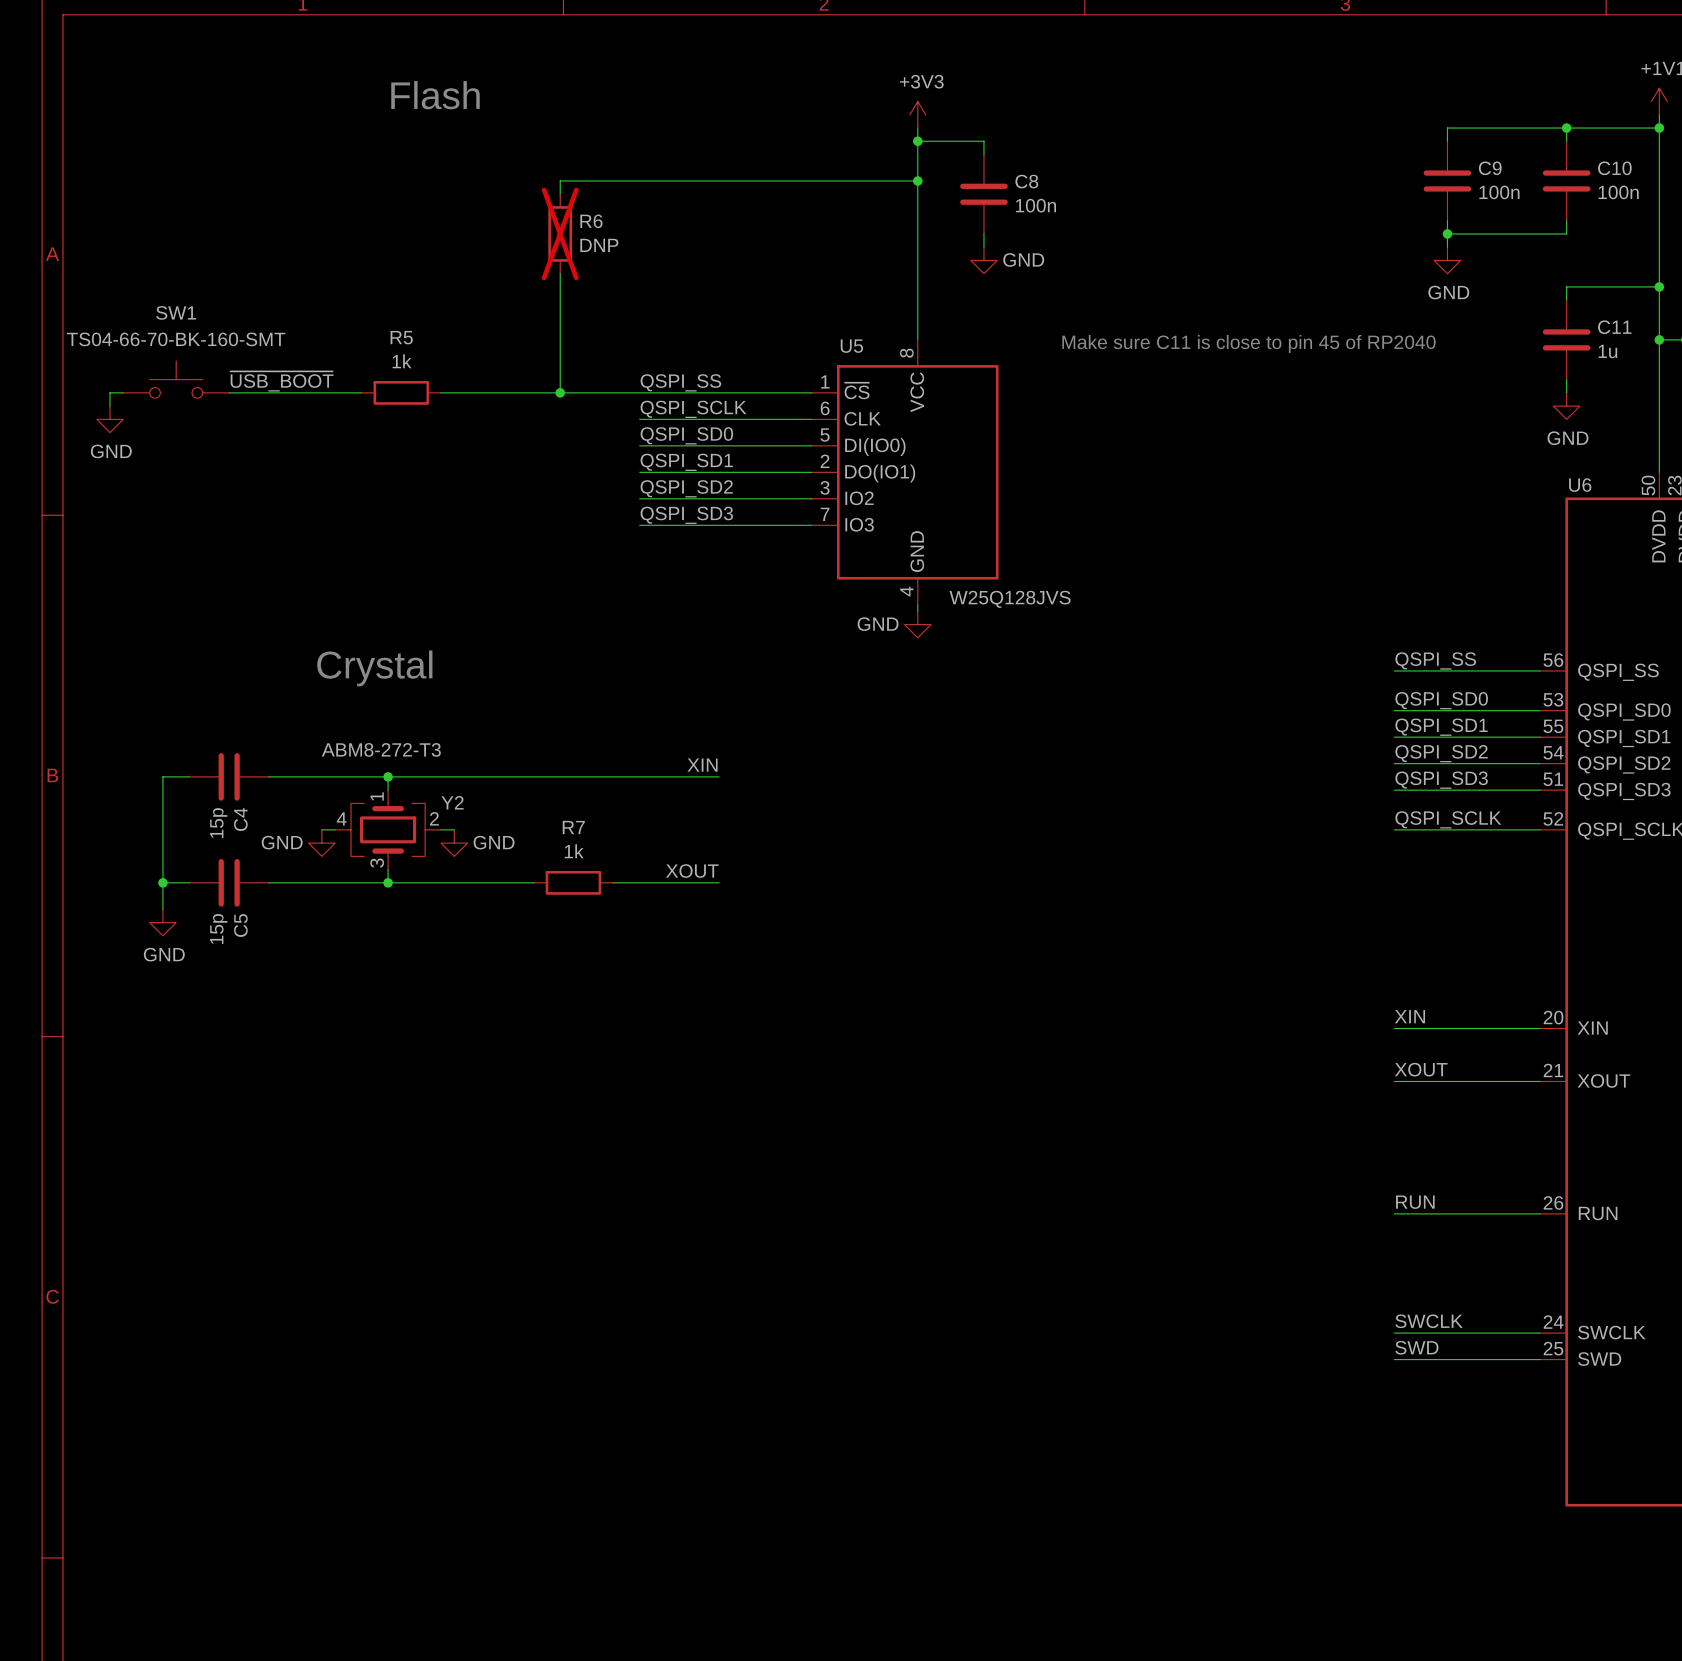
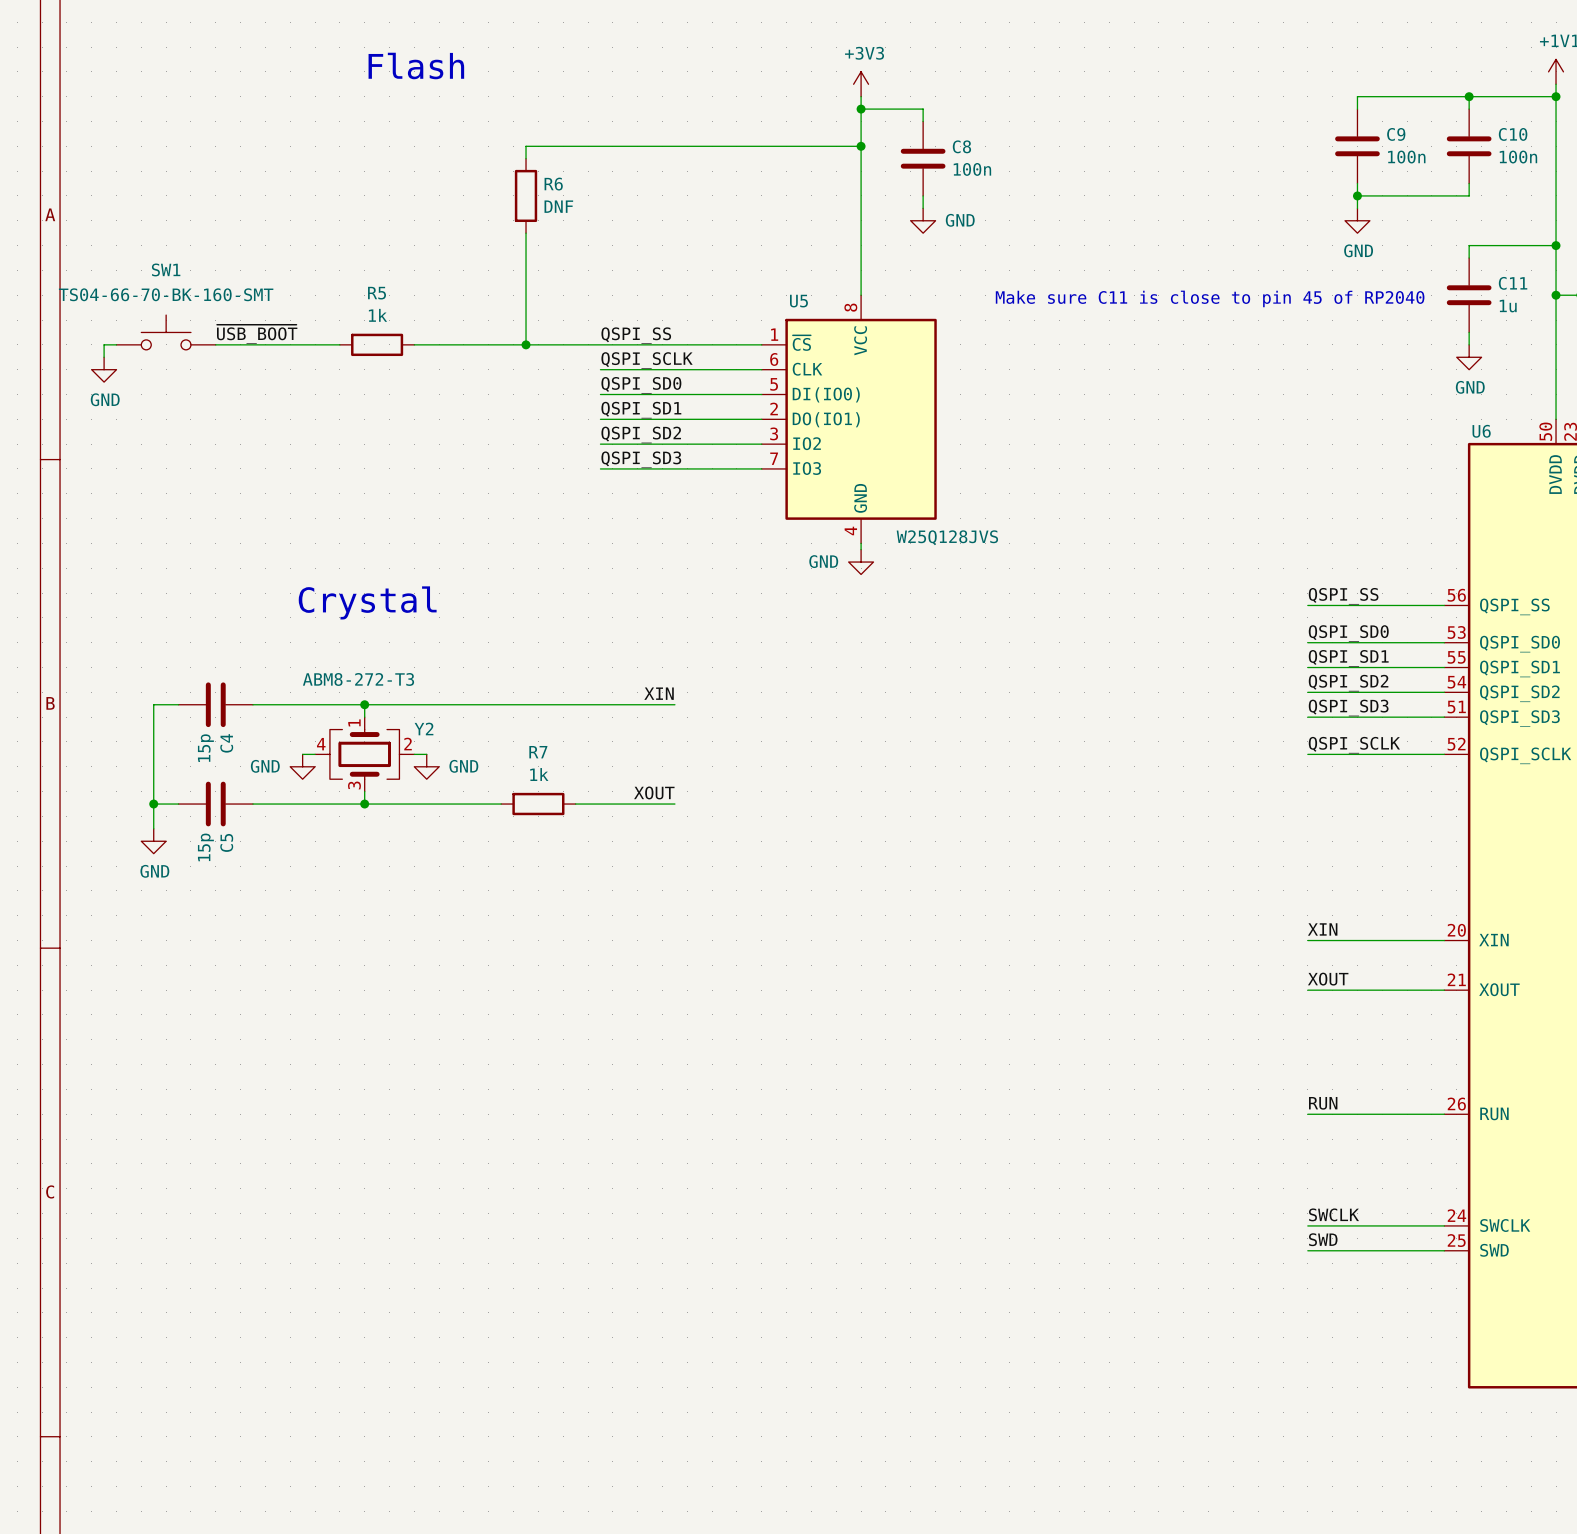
R6 do-not-place cross: (560, 233) -> none
R6 value: DNP (599, 245) -> DNF (558, 206)

